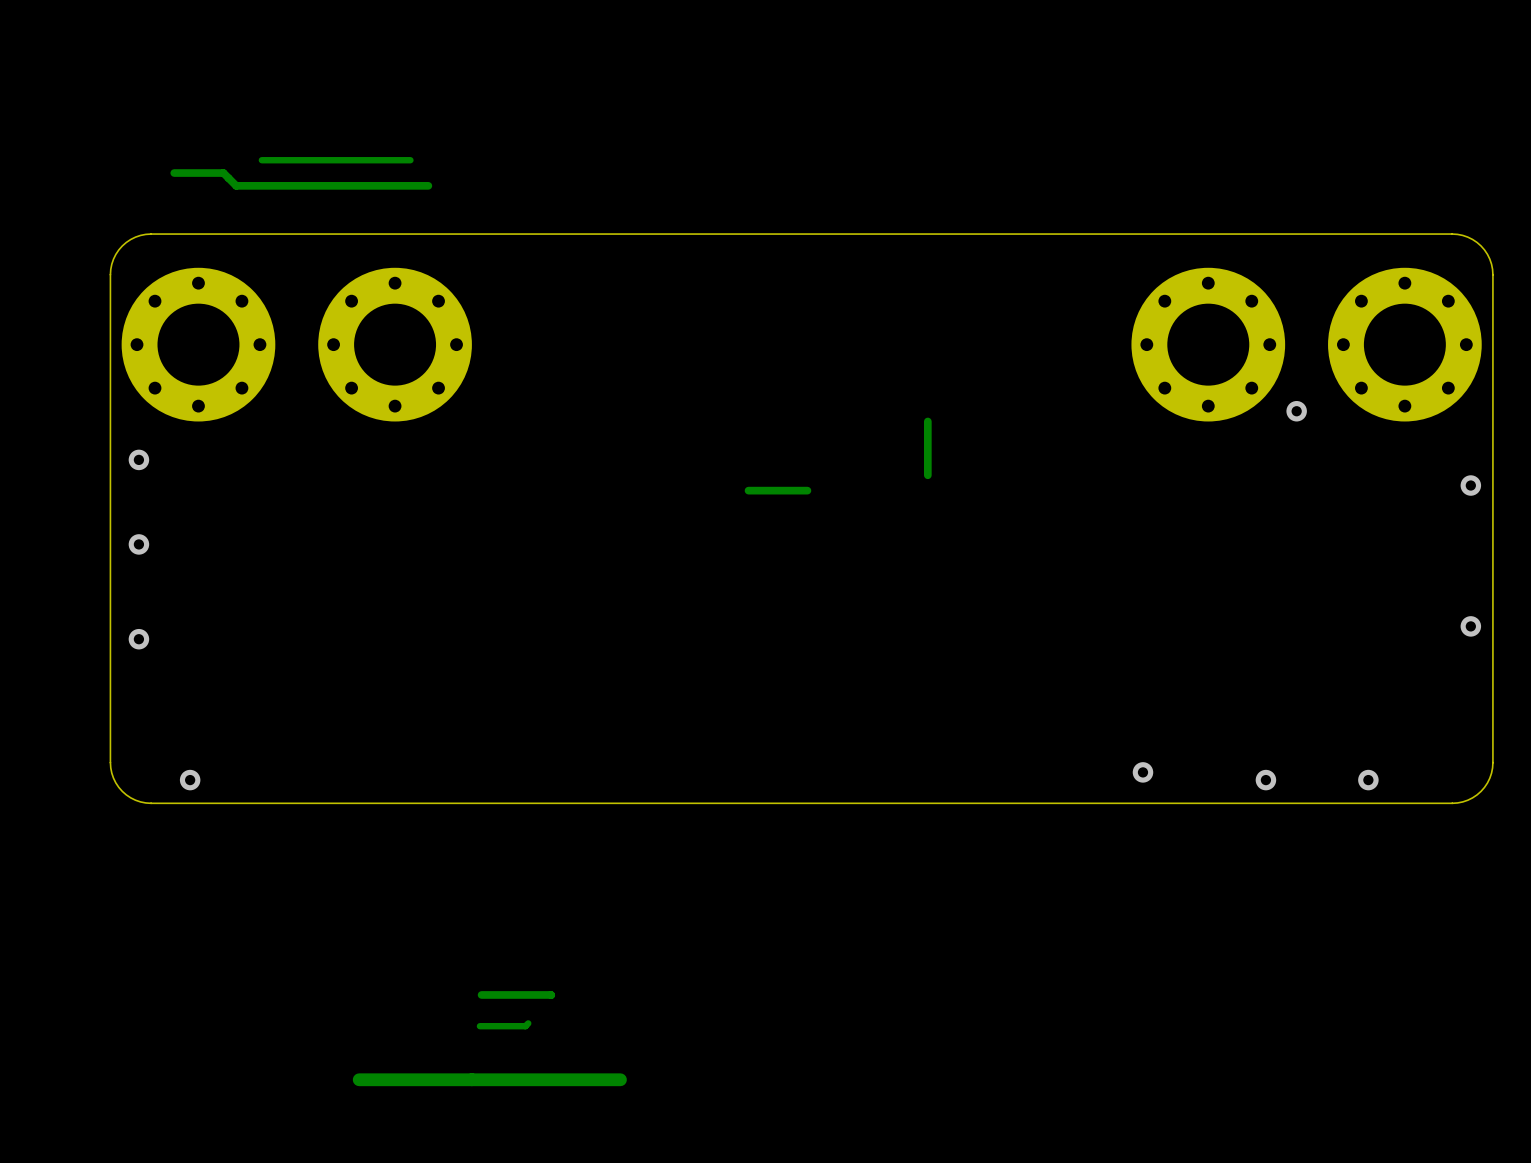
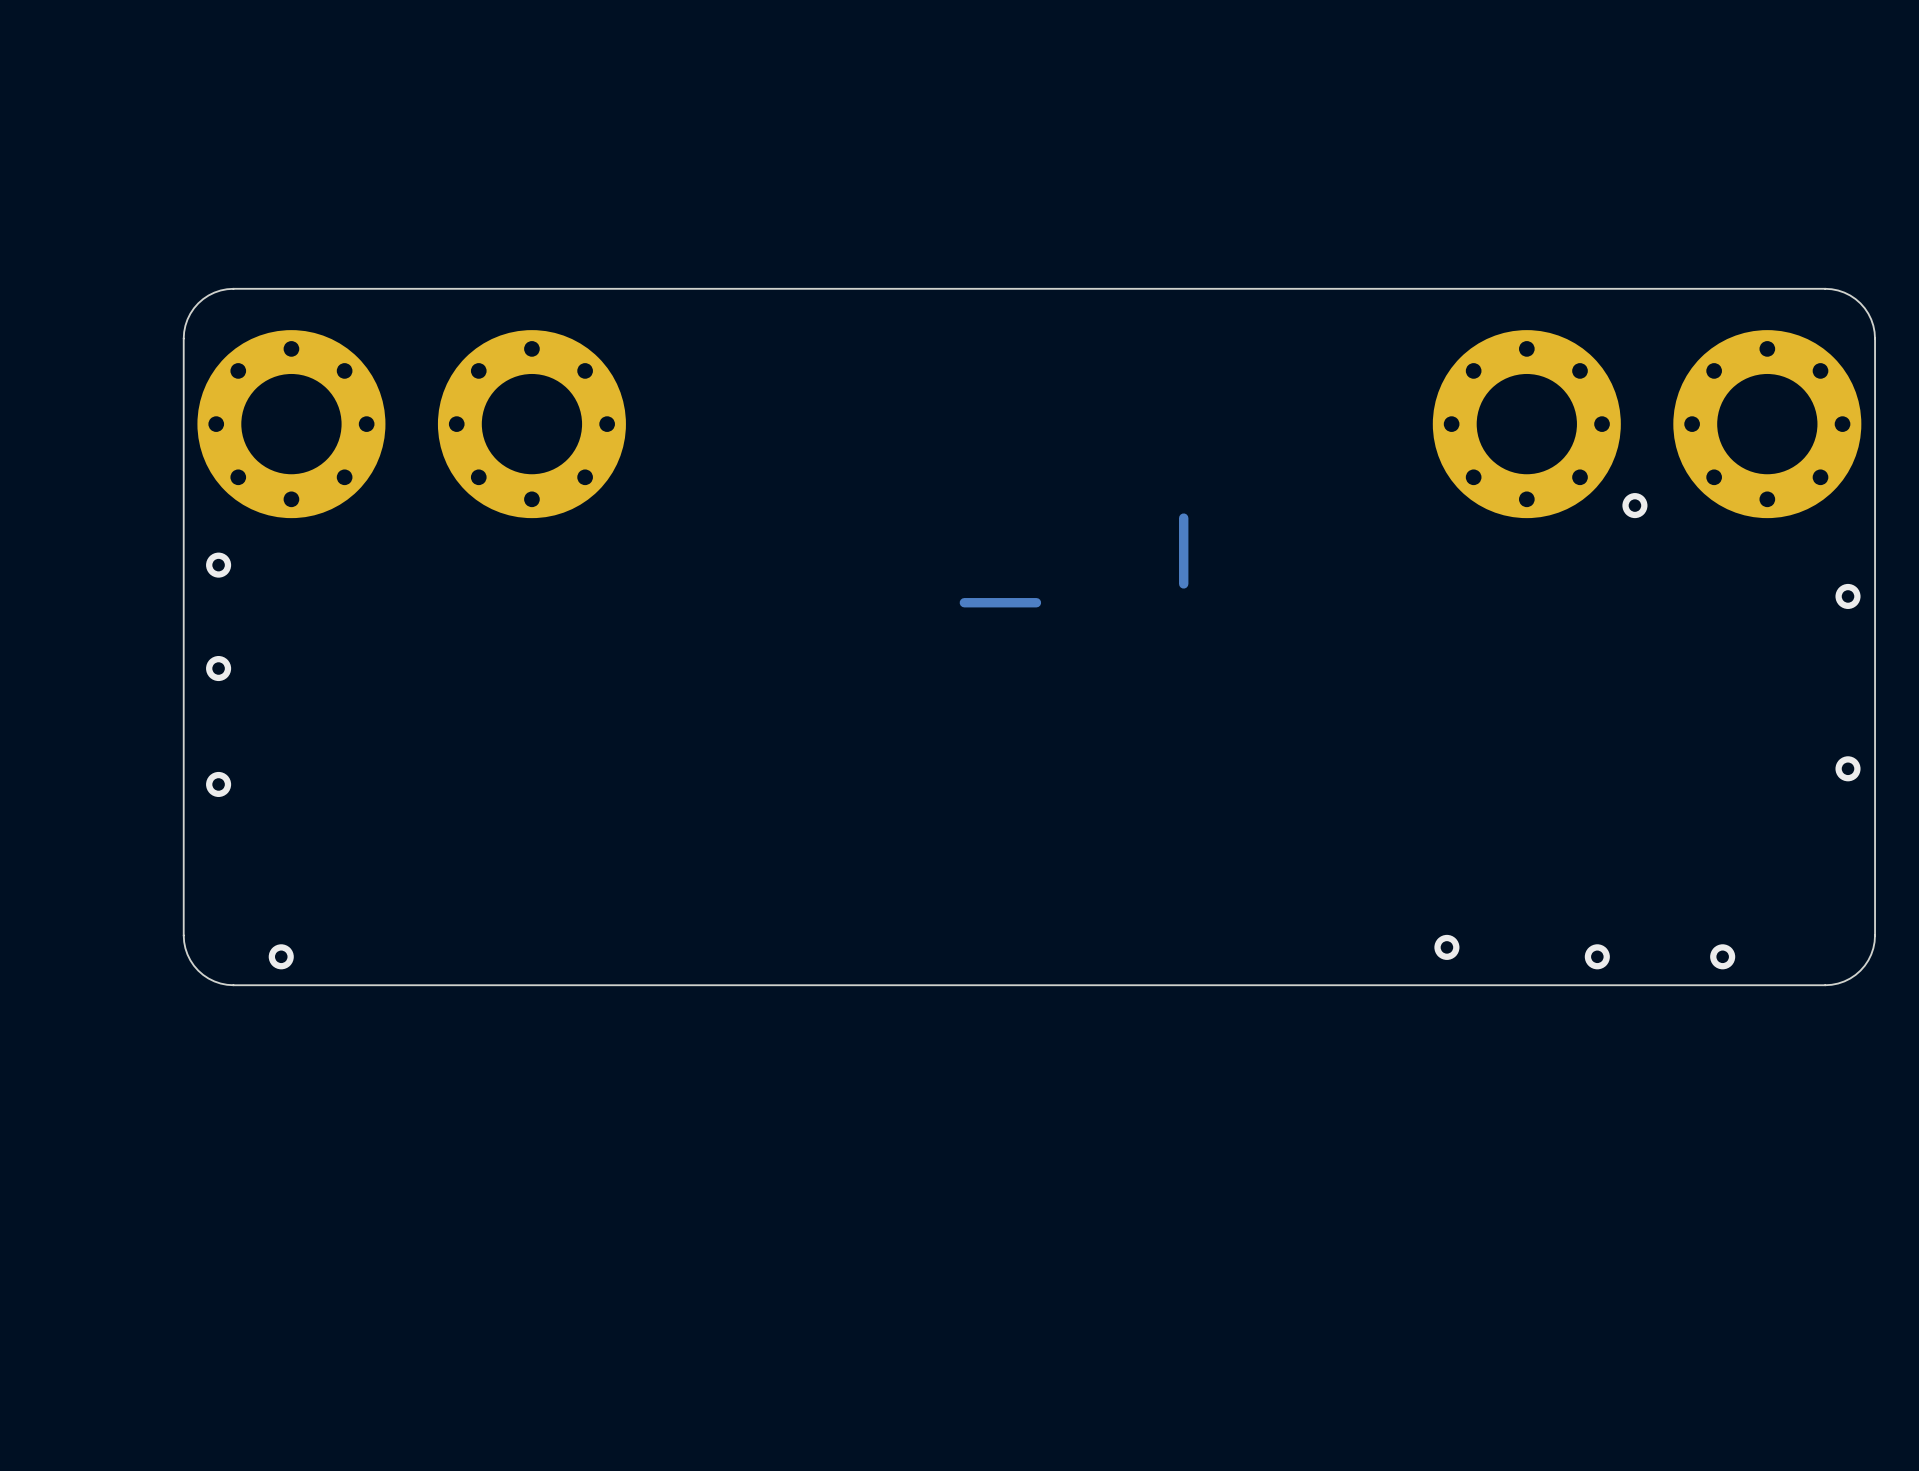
track: (410, 160) (261, 160) -> none
track: (174, 173) (223, 173) (236, 185) (428, 185) -> none
track: (551, 994) (481, 994) -> none
track: (528, 1023) (525, 1026) (479, 1026) -> none
track: (620, 1079) (359, 1079) -> none

